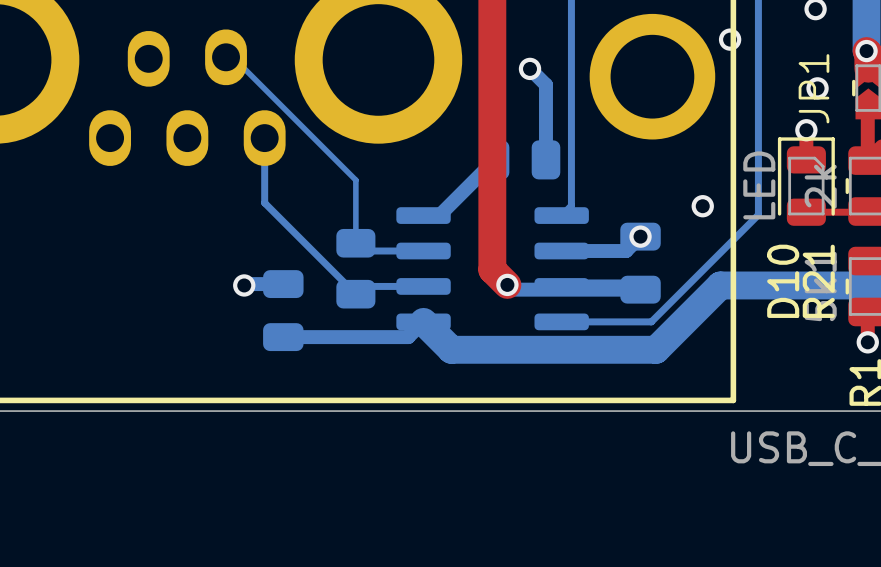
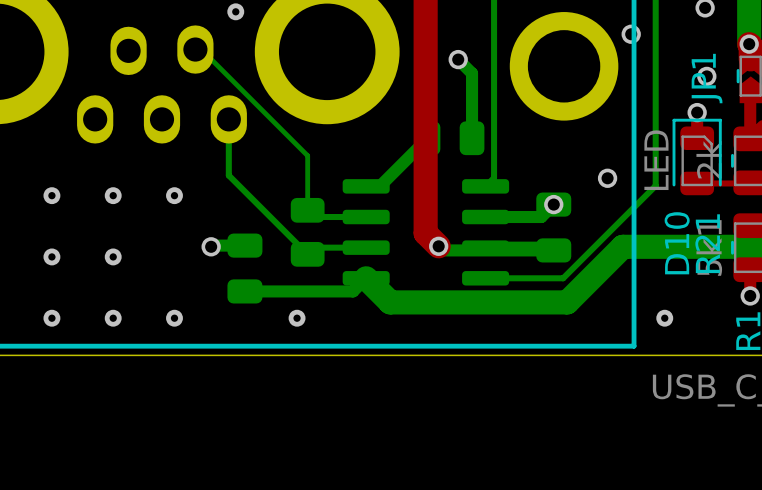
via: none -> (235, 11)
via: none -> (51, 195)
via: none -> (113, 195)
via: none -> (174, 195)
via: none -> (51, 256)
via: none -> (113, 256)
via: none -> (51, 318)
via: none -> (113, 318)
via: none -> (174, 318)
via: none -> (297, 318)
via: none -> (664, 318)

